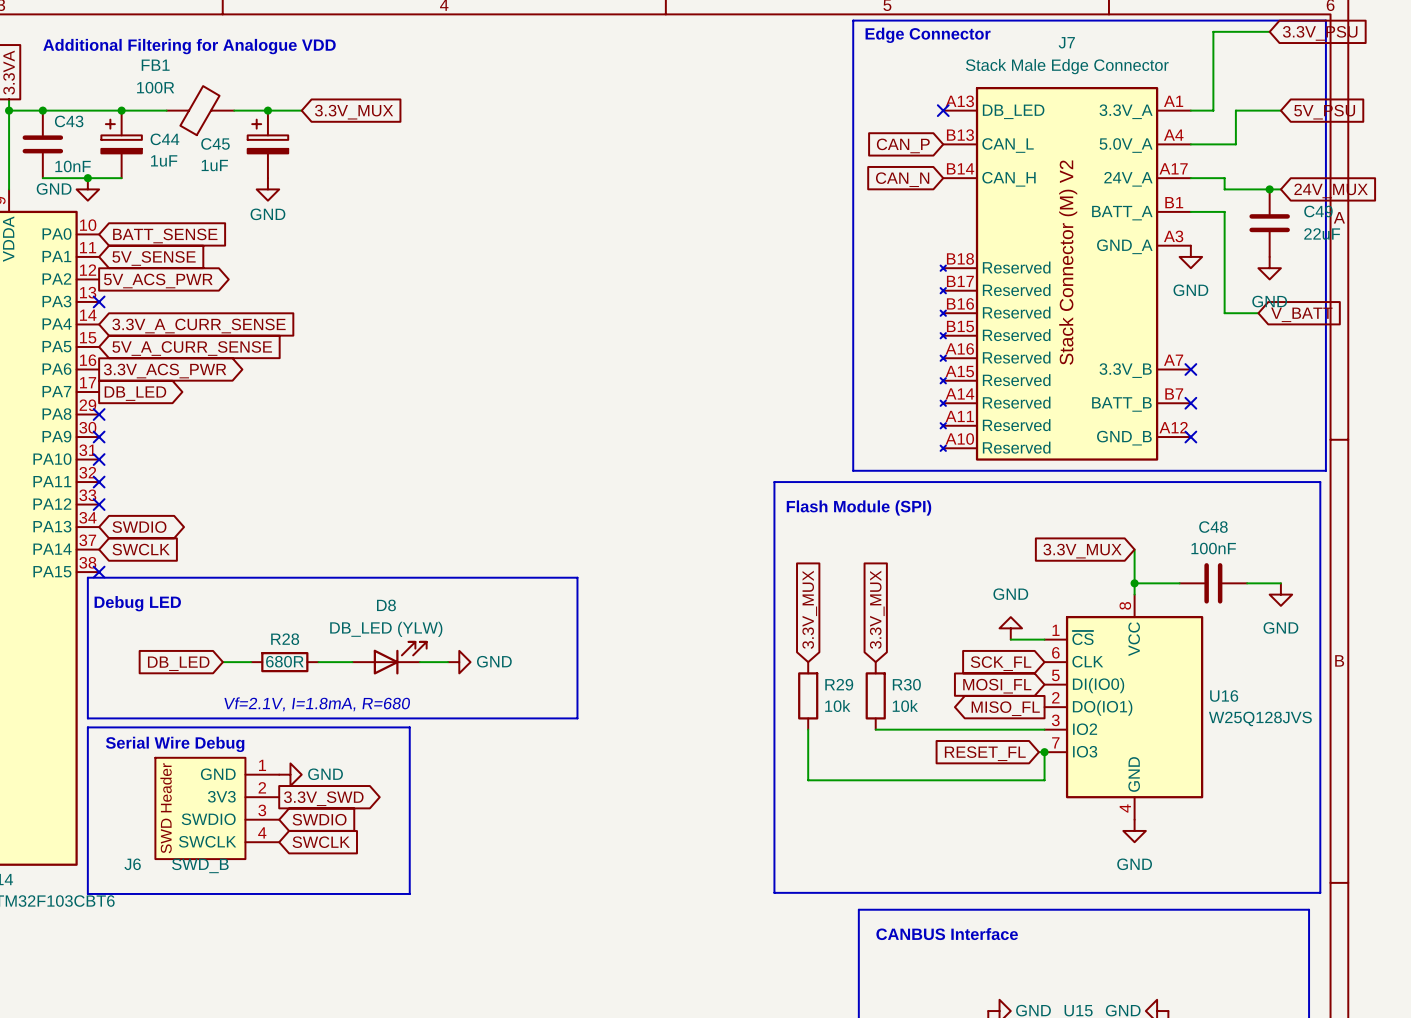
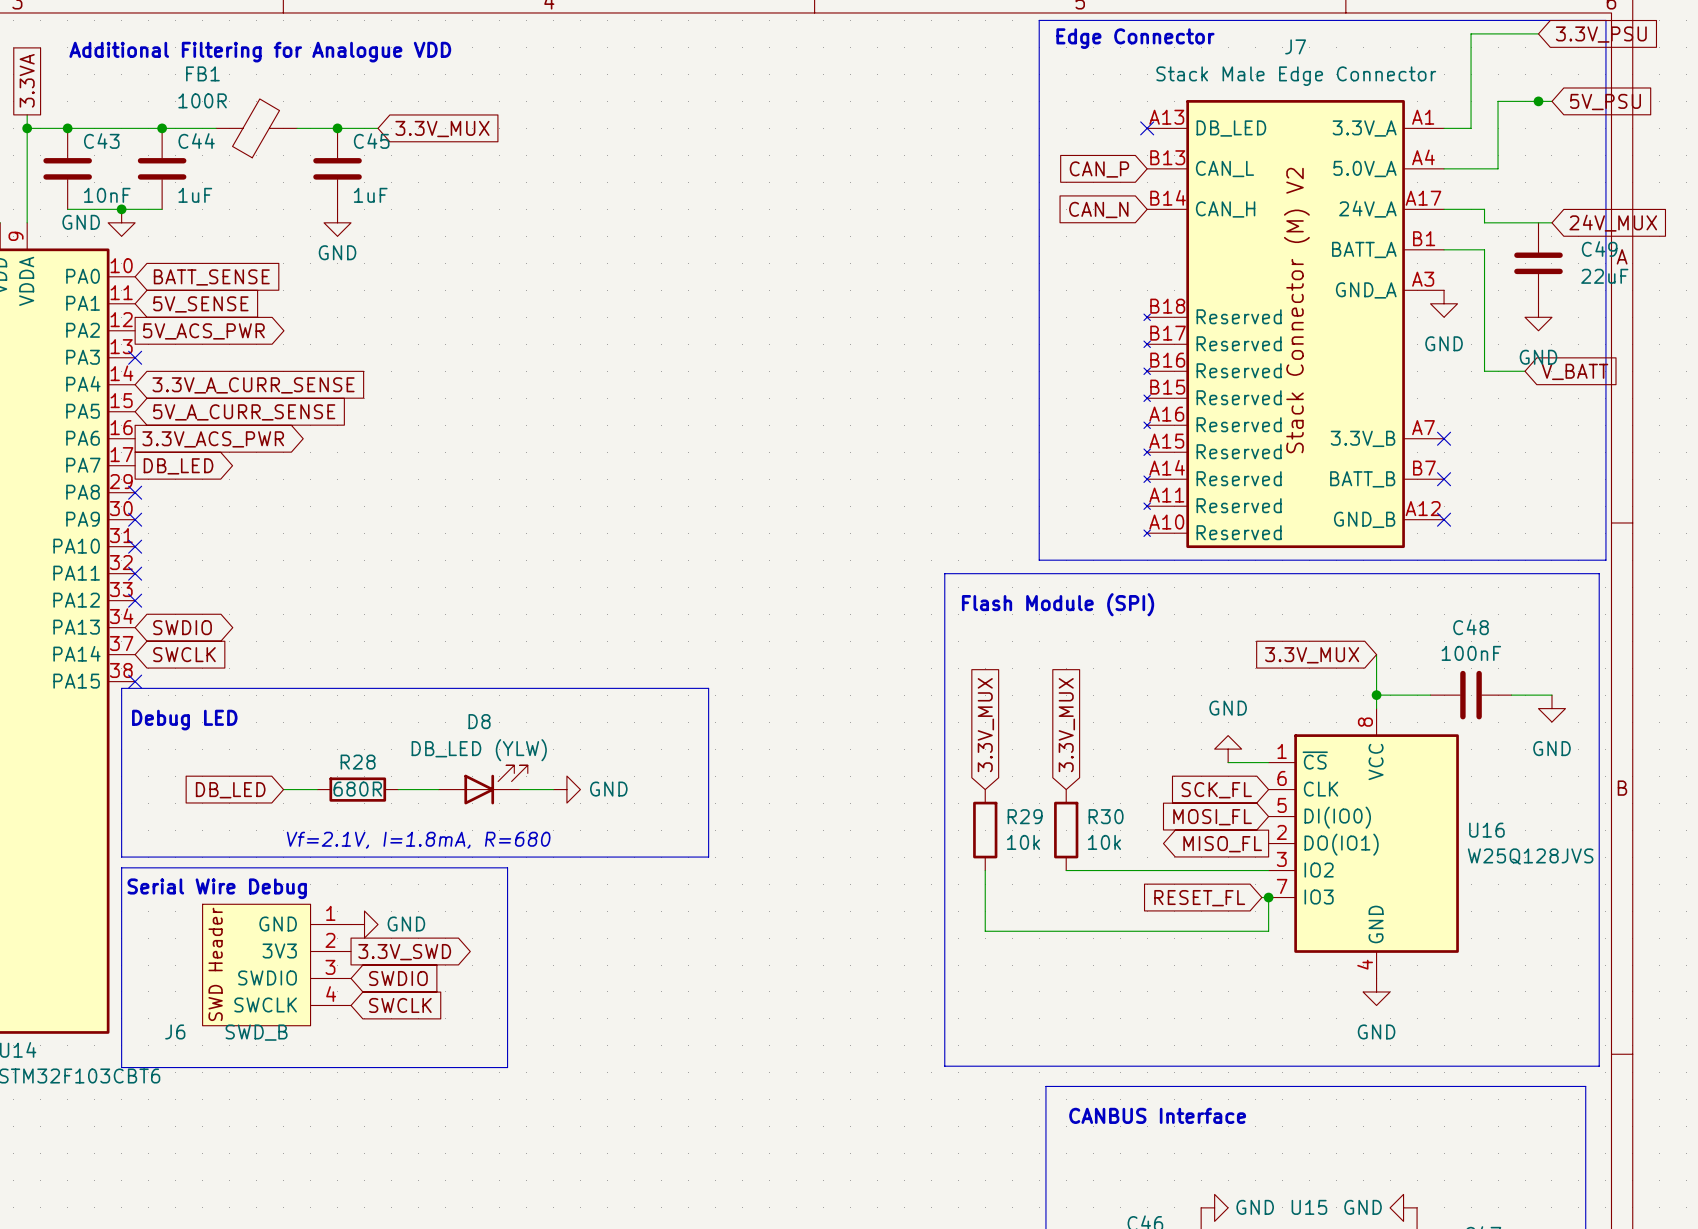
junction: none -> (1538, 101)
C44 symbol: [101, 110, 142, 179] -> [137, 128, 187, 210]
C45 symbol: [247, 110, 289, 179] -> [313, 128, 362, 210]
wire: (1235, 110) (1280, 110) -> (1498, 128) (1498, 101) (1551, 101)
global label position: 5V_PSU (1324, 112) -> 5V_PSU (1605, 102)
C44 name position: C44 (164, 139) -> C44 (196, 141)
C45 name position: C45 (215, 143) -> C45 (371, 141)
C44 value position: 1uF (164, 160) -> 1uF (195, 195)
C45 value position: 1uF (214, 165) -> 1uF (370, 195)
junction: (1269, 189) -> none

